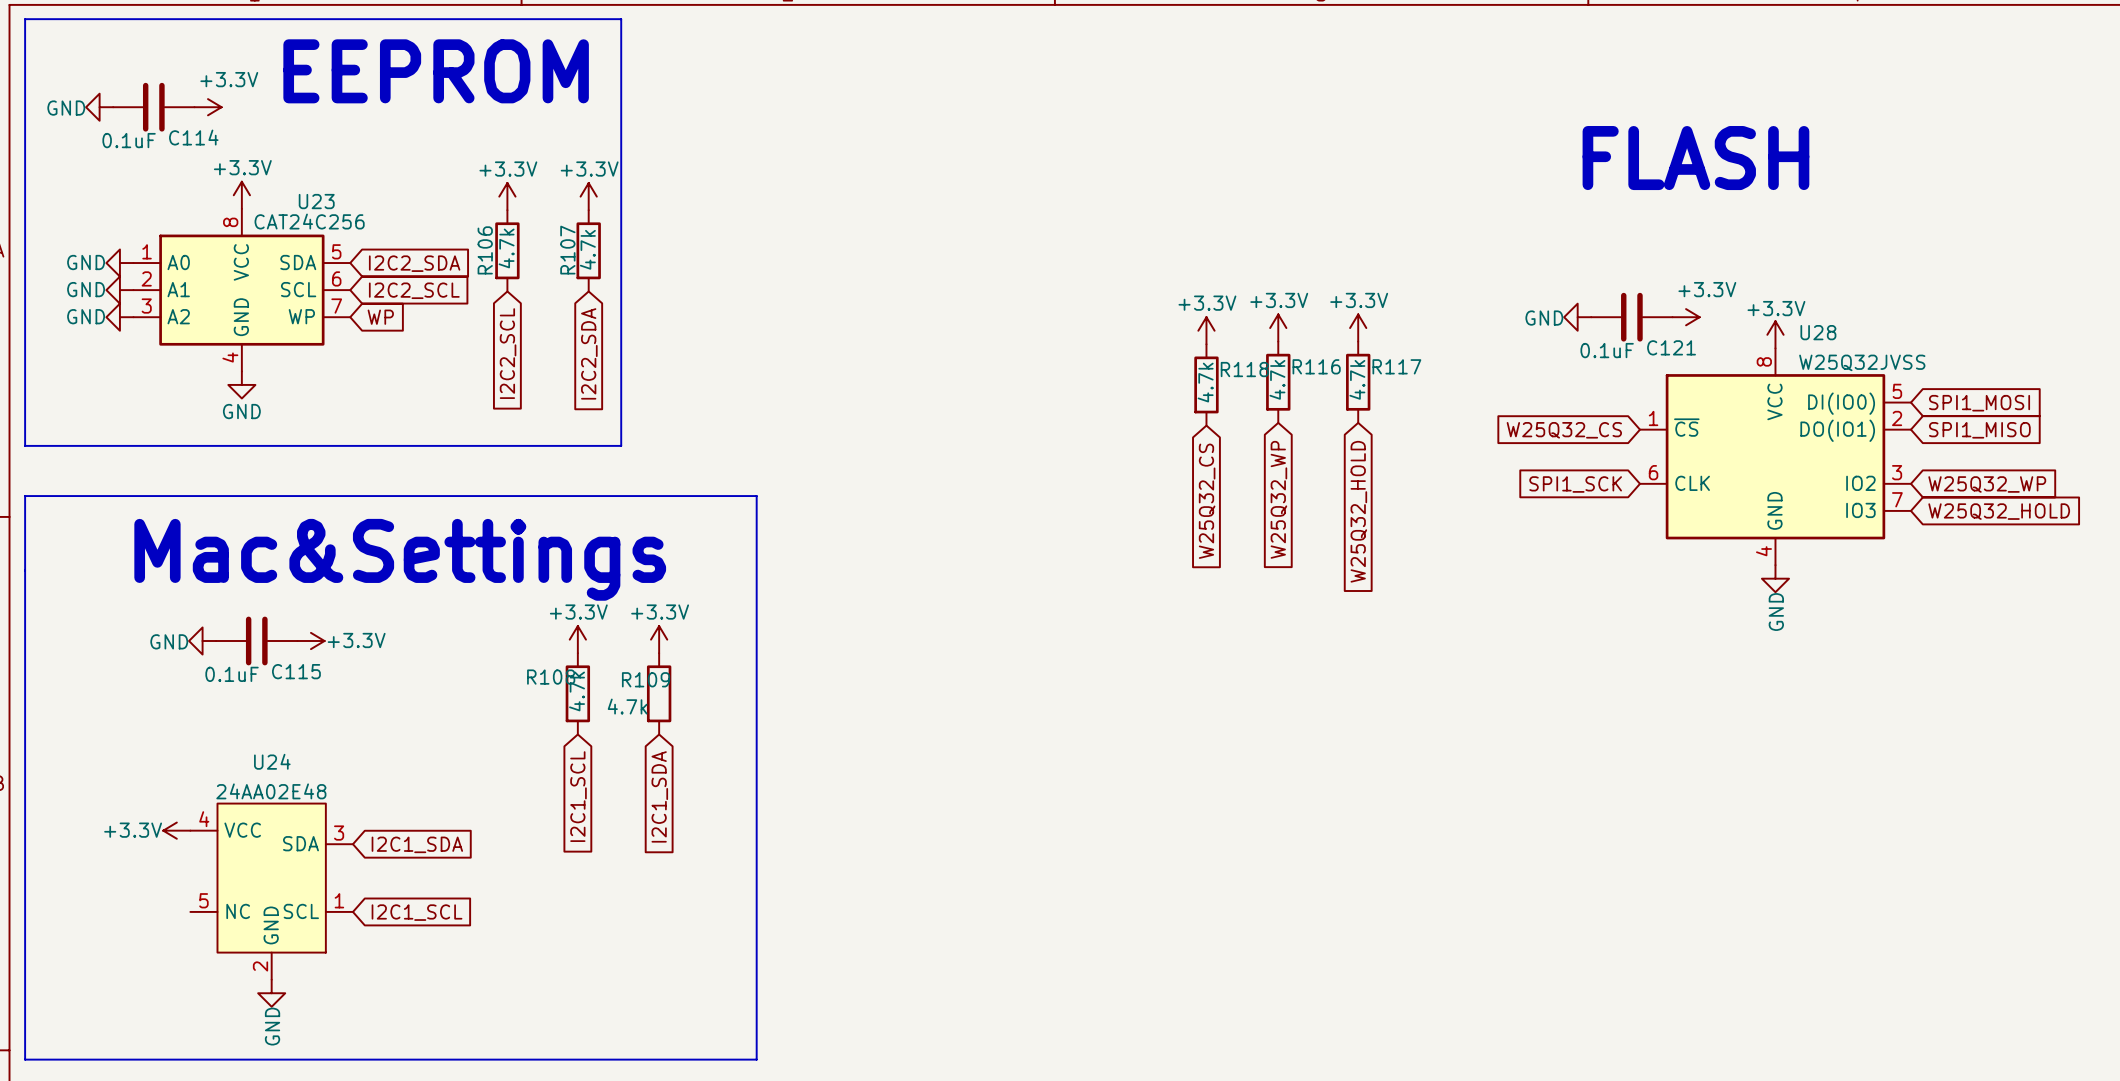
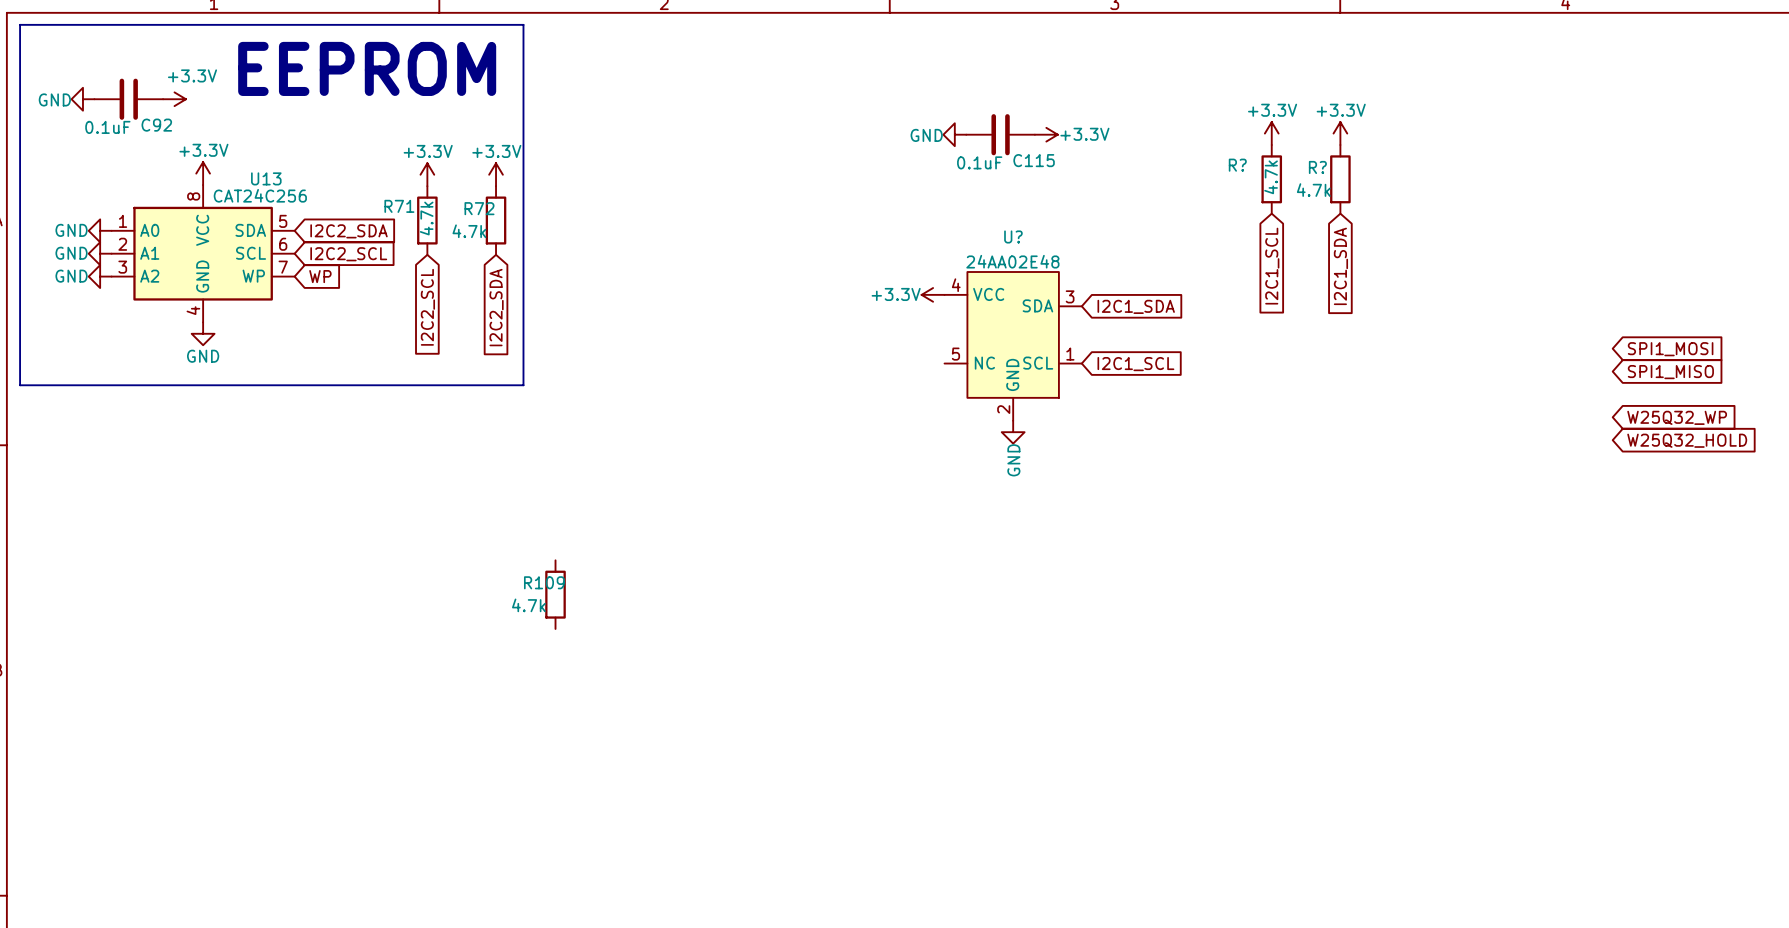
C114 name: C114 (193, 137) -> C92 (156, 125)
power symbol: none -> +3.3V (1271, 133)
power symbol: none -> +3.3V (1340, 133)
power symbol: none -> GND (954, 134)
power symbol: none -> +3.3V (1046, 134)
text: FLASH (1695, 158) -> none
U23 name: U23 (316, 201) -> U13 (266, 178)
R?: none -> 4.7k (1271, 179)
R?: none -> 4.7k (1340, 179)
R107 value rotation: 0° (587, 249) -> 90° clockwise (469, 231)
R106 name: R106 (485, 250) -> R71 (399, 206)
R107 name: R107 (567, 250) -> R72 (479, 208)
global label: none -> I2C1_SCL (1272, 266)
global label: none -> I2C1_SDA (1340, 266)
power symbol: GND (1577, 317) -> none
C121: 0.1uF (1631, 317) -> none
power symbol: +3.3V (1686, 317) -> none
power symbol: +3.3V (1278, 328) -> none
power symbol: +3.3V (1358, 328) -> none
power symbol: +3.3V (1206, 330) -> none
power symbol: +3.3V (1775, 334) -> none
power symbol: none -> +3.3V (933, 294)
global label: none -> I2C1_SDA (1136, 306)
R116: 4.7k (1278, 382) -> none
R117: 4.7k (1358, 382) -> none
R118: 4.7k (1206, 384) -> none
U?: none -> 24AA02E48 (1013, 346)
global label: W25Q32_CS (1564, 430) -> none
U28: W25Q32JVSS (1775, 456) -> none
global label: SPI1_SCK (1575, 484) -> none
line: (25, 496) (25, 1059) (756, 1059) (756, 496) (25, 496) -> none
global label: W25Q32_WP (1278, 499) -> I2C1_SCL (1135, 364)
power symbol: none -> GND (1013, 432)
global label: W25Q32_CS (1207, 501) -> none
global label: W25Q32_HOLD (1358, 511) -> none
text: Mac&Settings (400, 559) -> none
power symbol: GND (1775, 578) -> none
power symbol: +3.3V (577, 639) -> none
power symbol: +3.3V (659, 639) -> none
power symbol: GND (202, 640) -> none
C115 position: (256, 640) -> (1000, 134)
power symbol: +3.3V (310, 640) -> none
R108: 4.7k (577, 693) -> none
global label: I2C1_SCL (578, 796) -> none
global label: I2C1_SDA (659, 796) -> none
power symbol: +3.3V (176, 830) -> none
global label: I2C1_SDA (417, 844) -> none
U24: 24AA02E48 (271, 891) -> none
global label: I2C1_SCL (417, 912) -> none
power symbol: GND (271, 993) -> none

